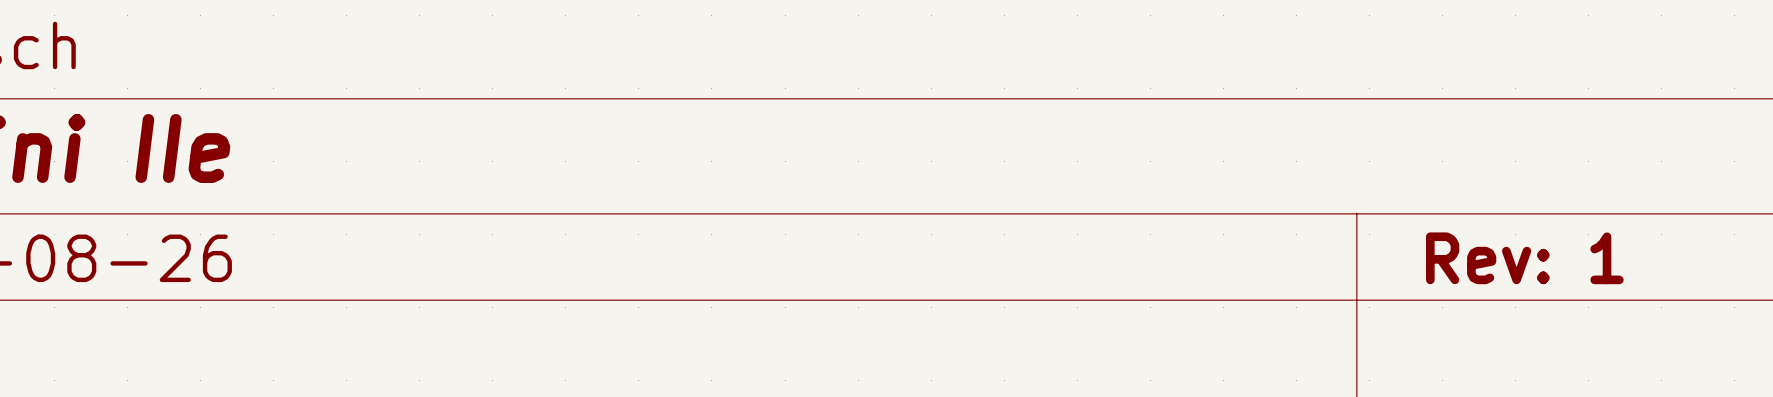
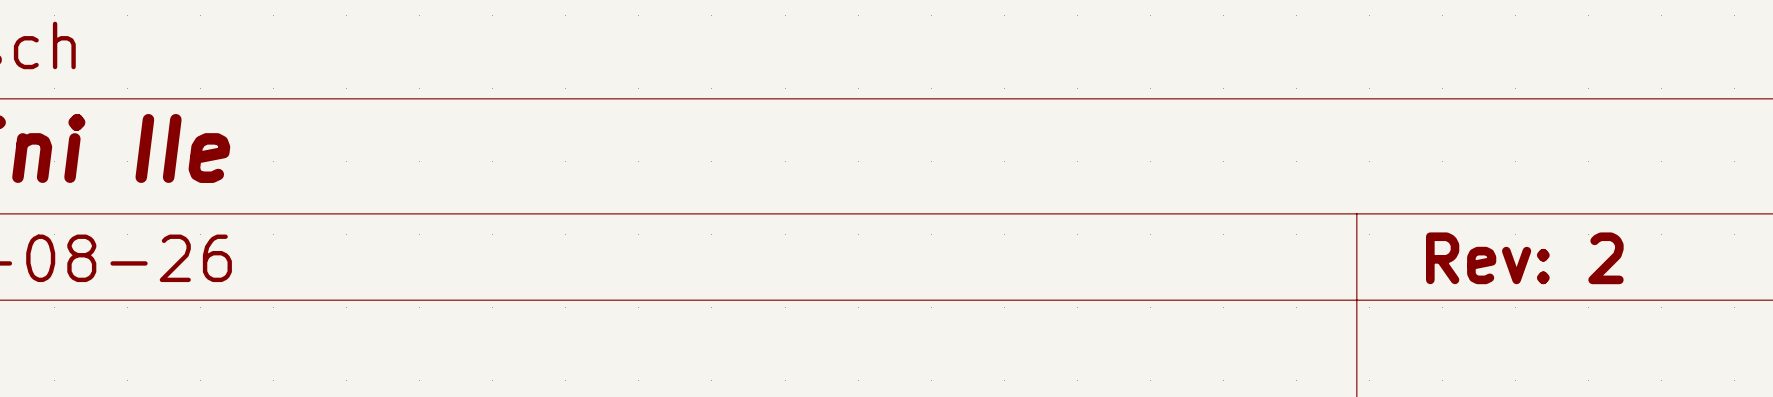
title block: Rev: 1 (1524, 258) -> Rev: 2 (1524, 258)

